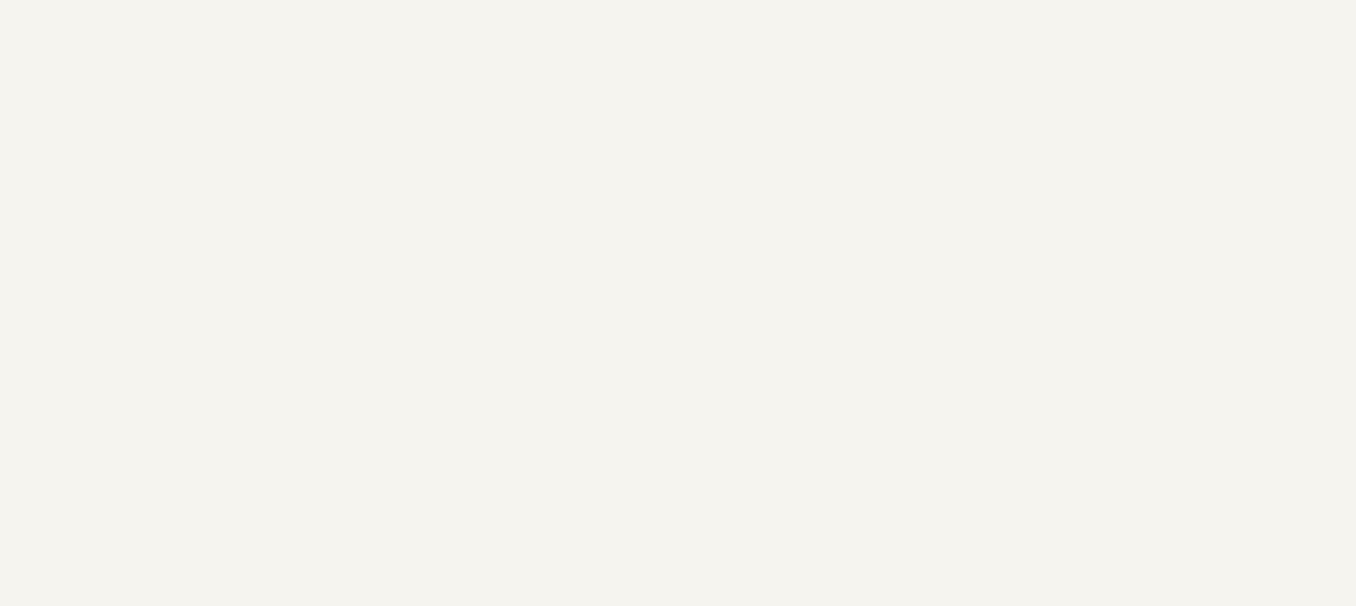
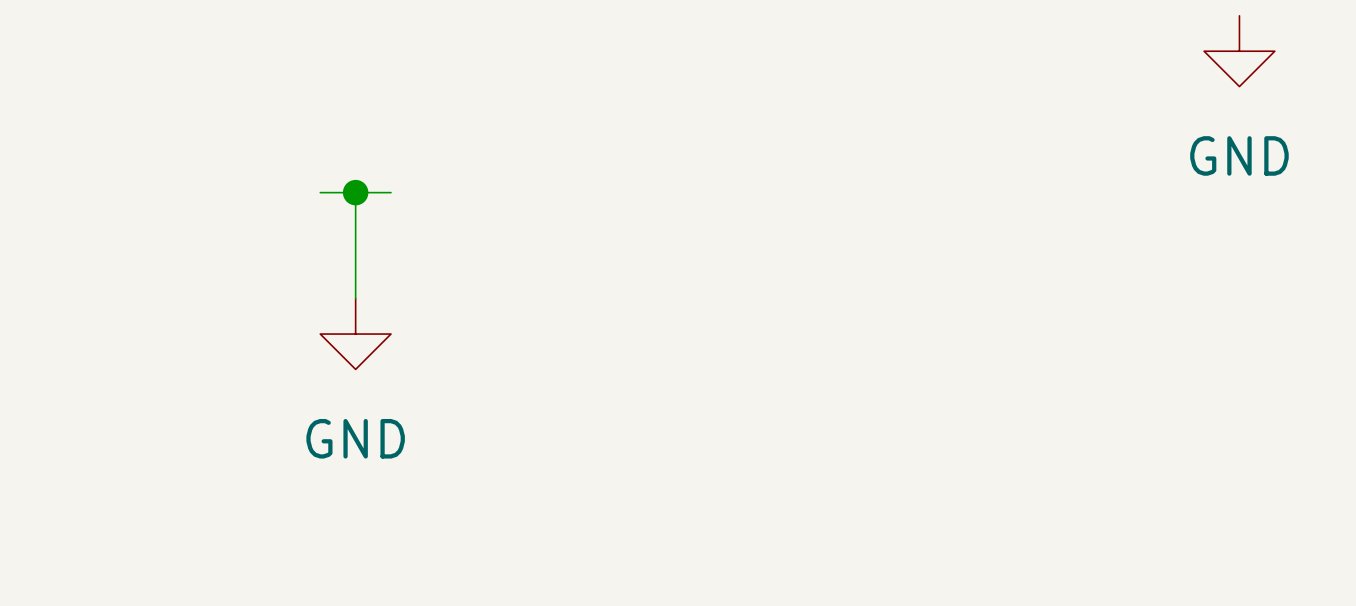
power symbol: none -> GND (1239, 51)
wire: none -> (320, 192) (390, 192)
wire: none -> (355, 192) (355, 298)
junction: none -> (355, 192)
power symbol: none -> GND (355, 334)

